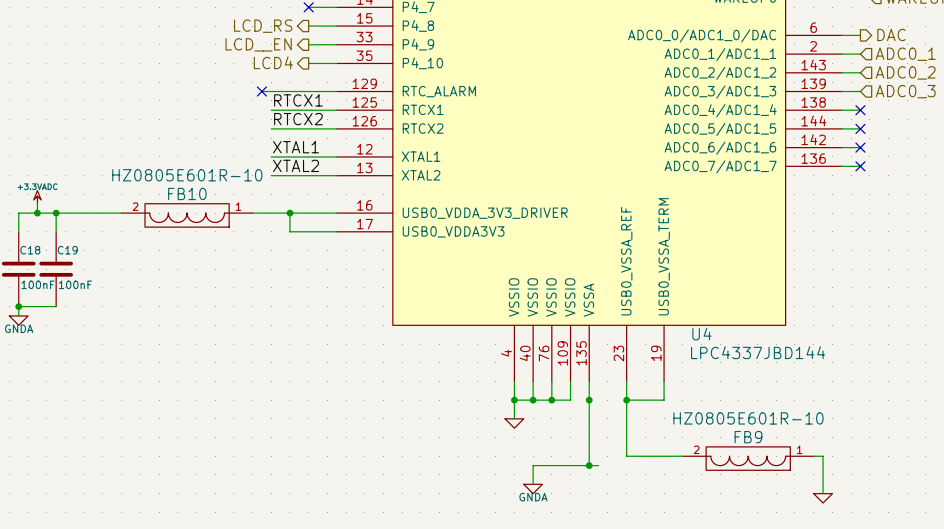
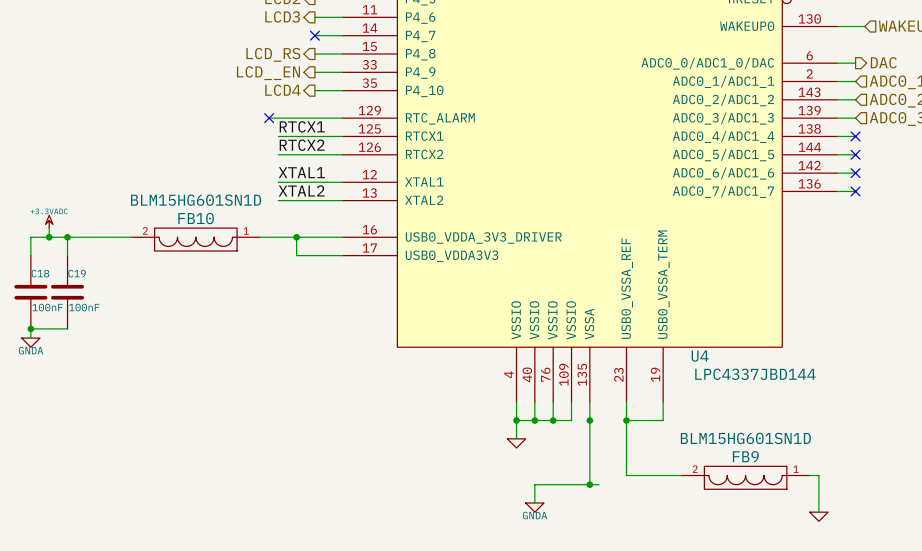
FB10 value: HZ0805E601R-10 (187, 175) -> BLM15HG601SN1D (196, 200)
FB9 value: HZ0805E601R-10 (748, 418) -> BLM15HG601SN1D (745, 438)

